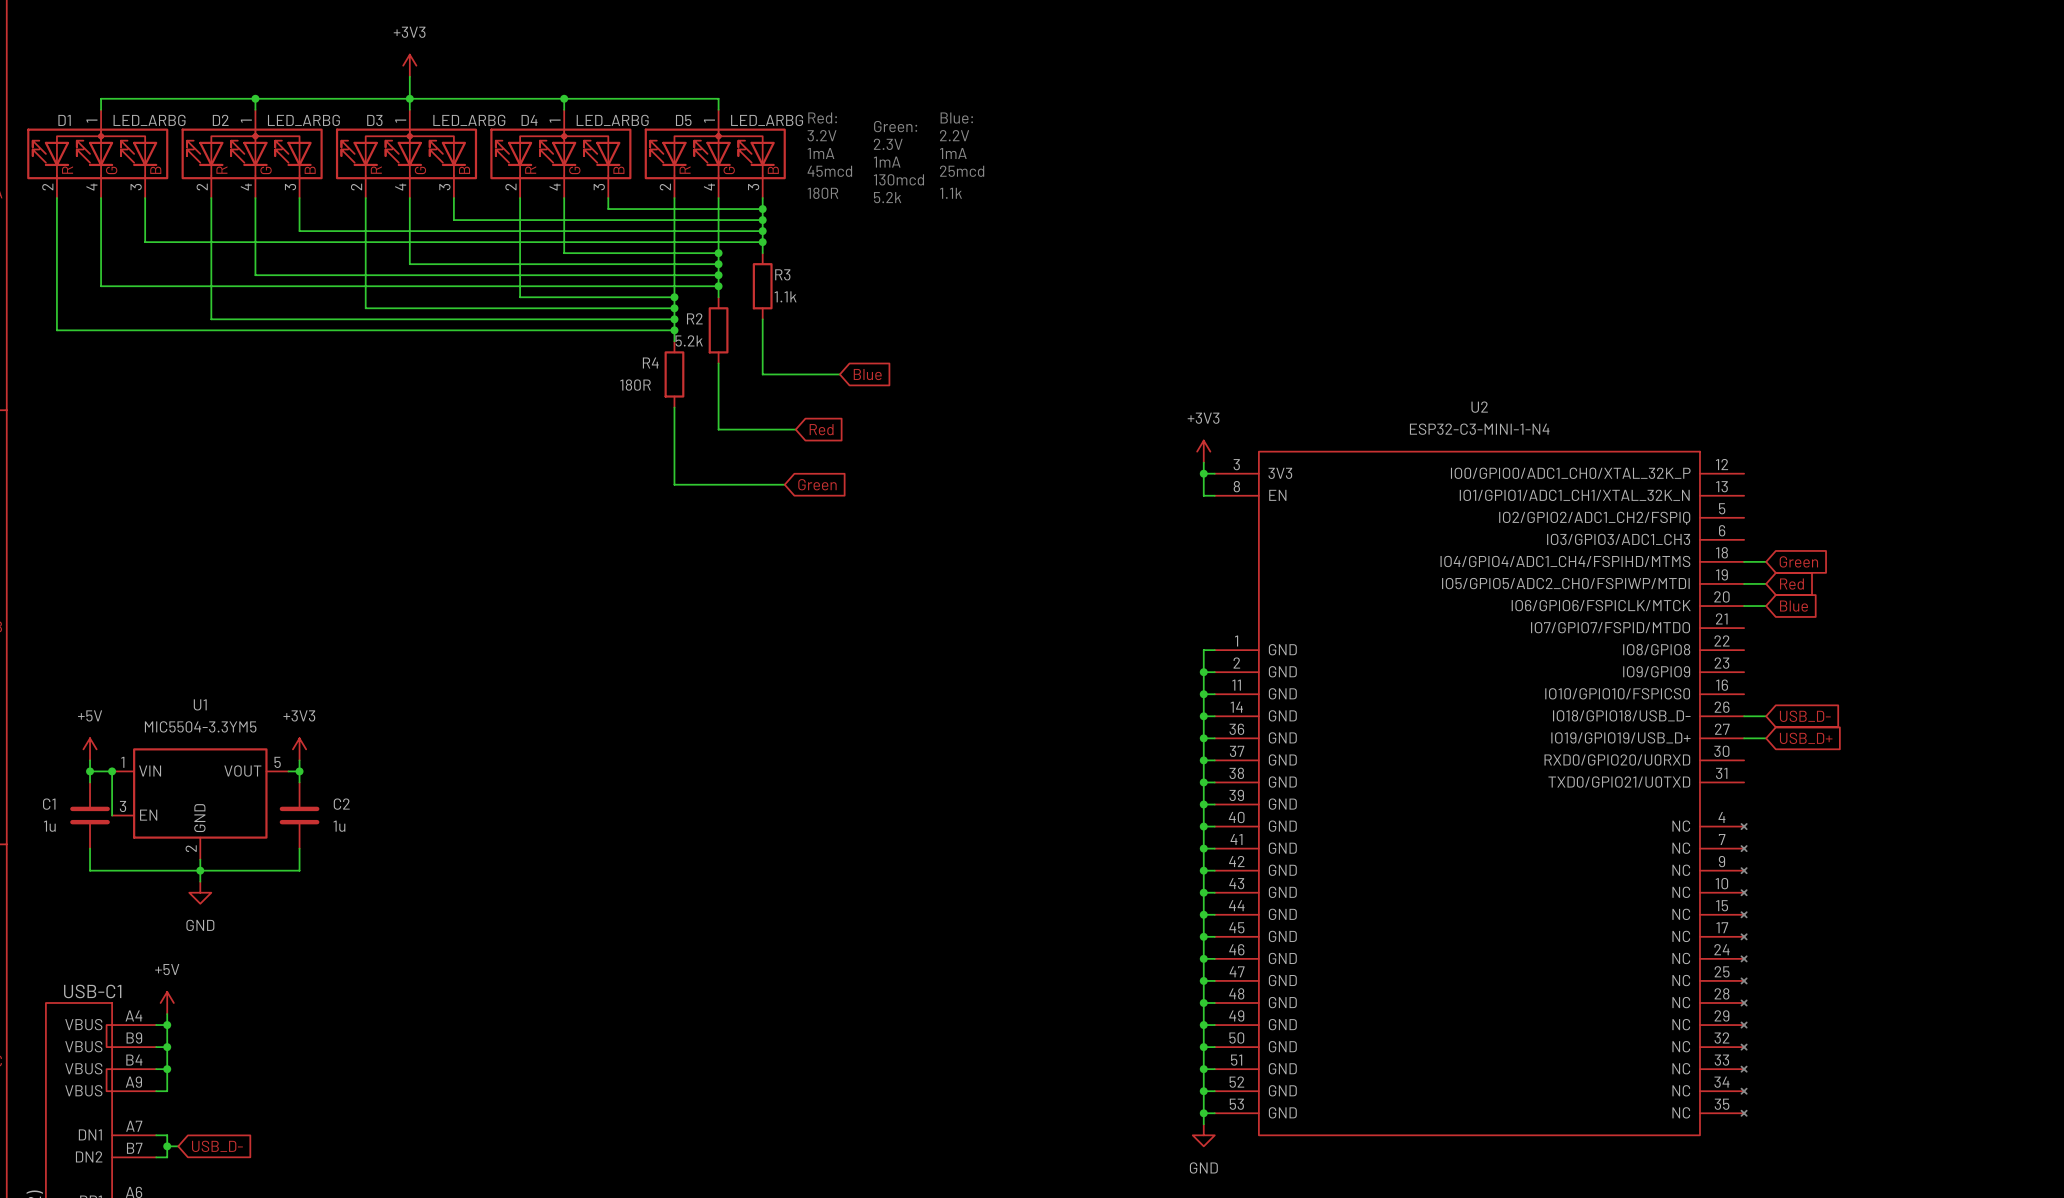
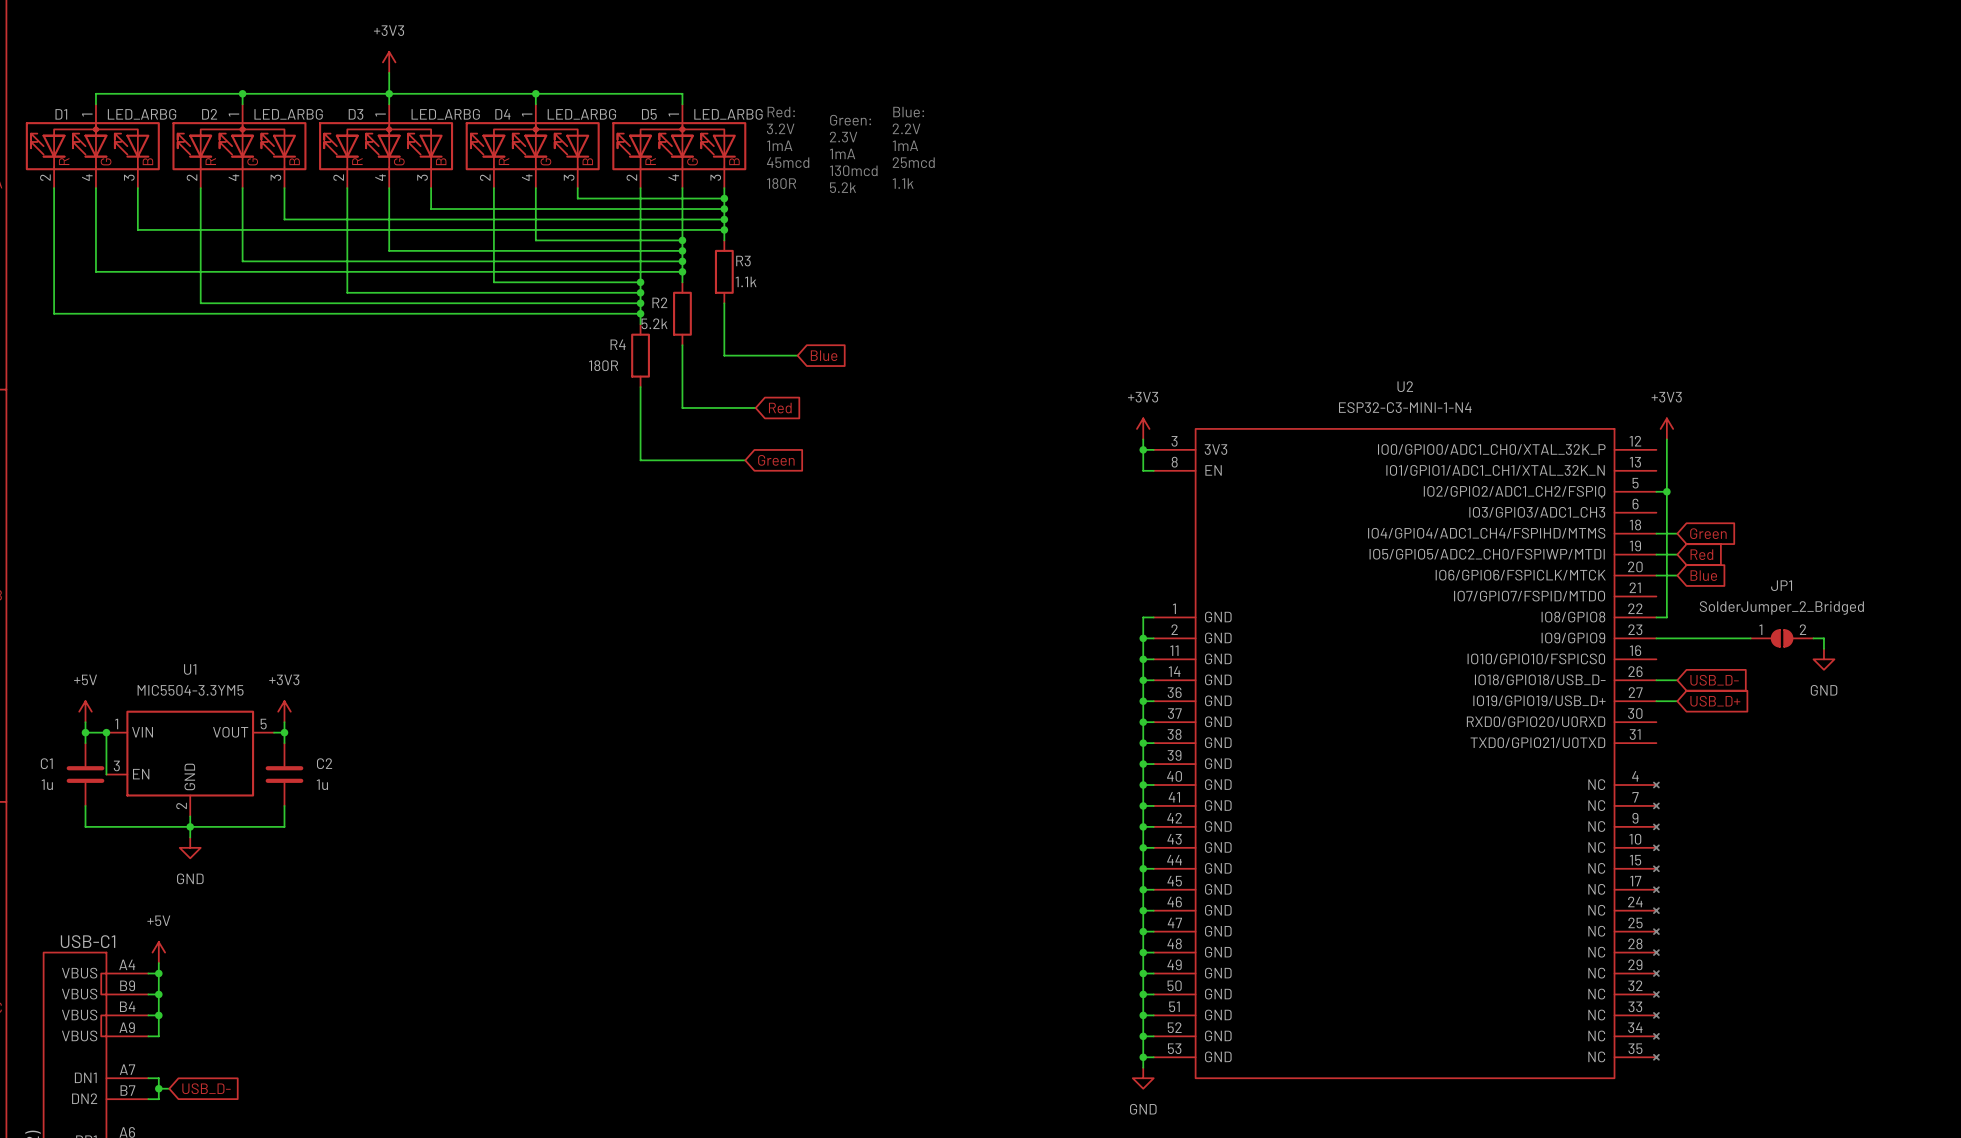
power symbol: none -> +3V3 (1666, 428)
wire: none -> (1666, 439) (1666, 617) (1656, 617)
wire: none -> (1656, 491) (1666, 491)
junction: none -> (1666, 491)
wire: none -> (1656, 638) (1750, 638)
JP1: none -> SolderJumper_2_Bridged (1782, 638)
wire: none -> (1813, 638) (1823, 638) (1823, 648)
power symbol: none -> GND (1823, 659)

